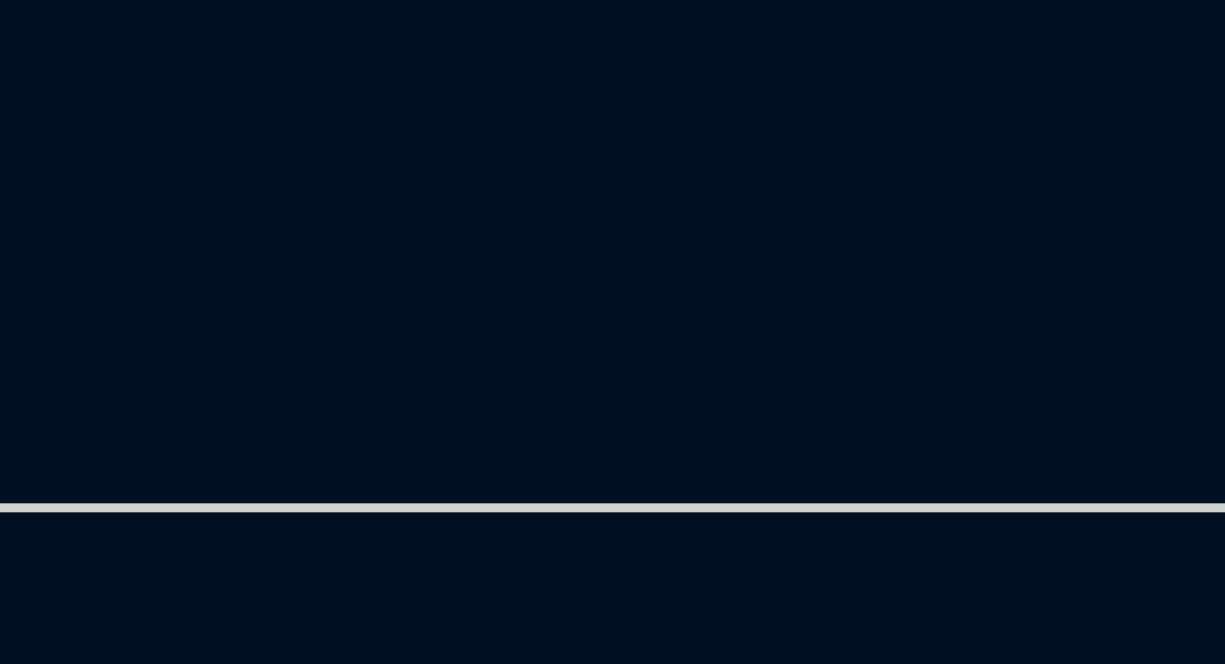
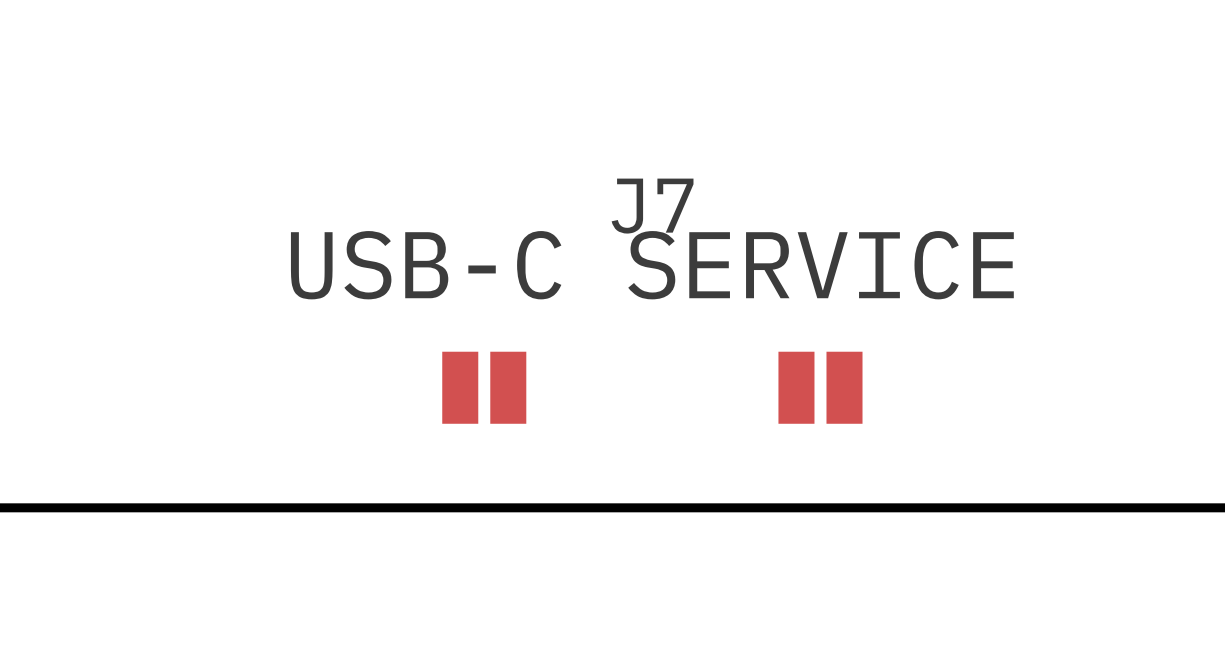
text: none -> USB-C SERVICE (652, 265)
J7: none -> (652, 387)

